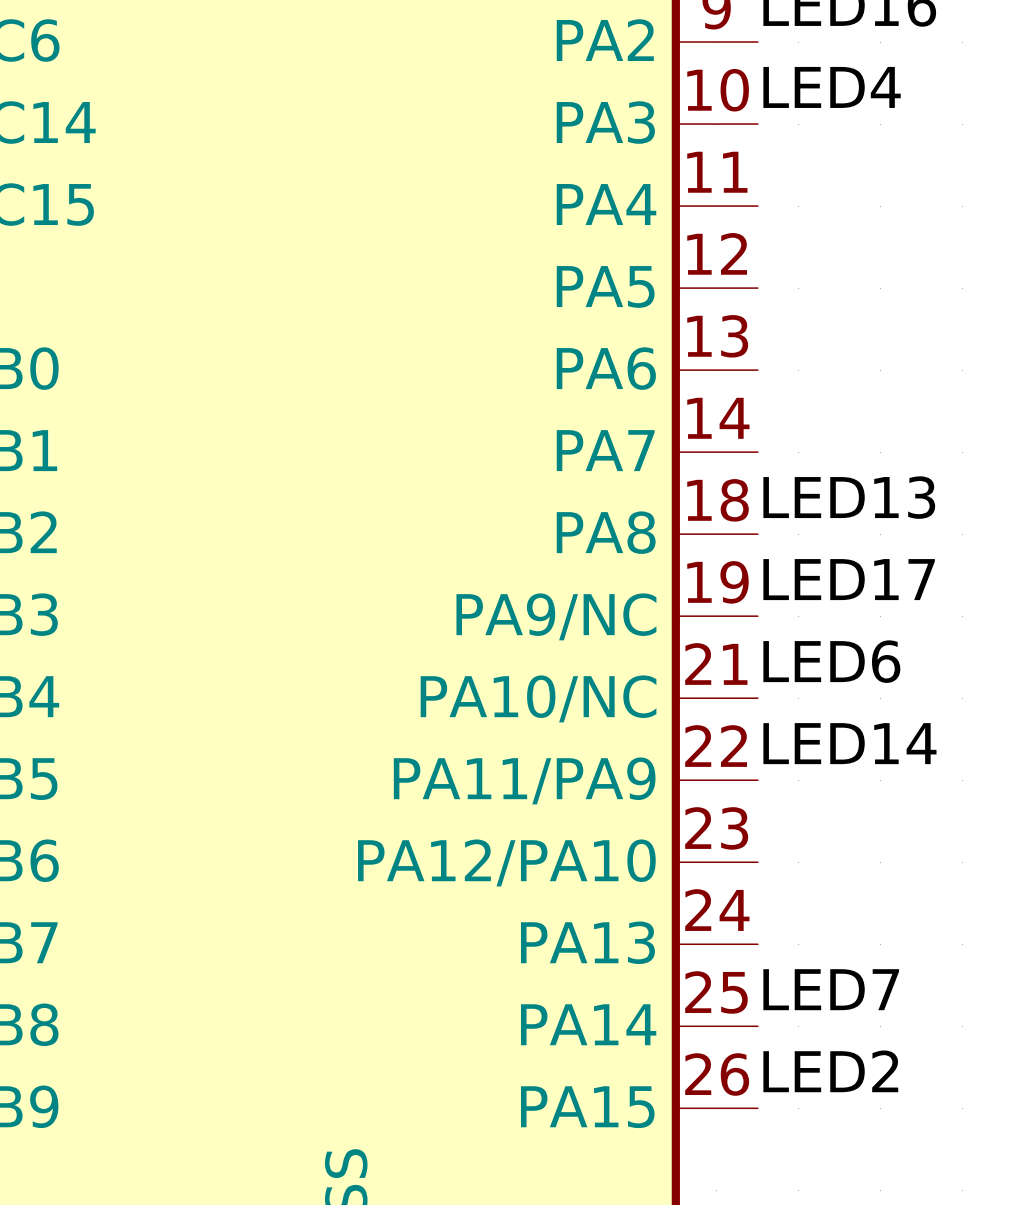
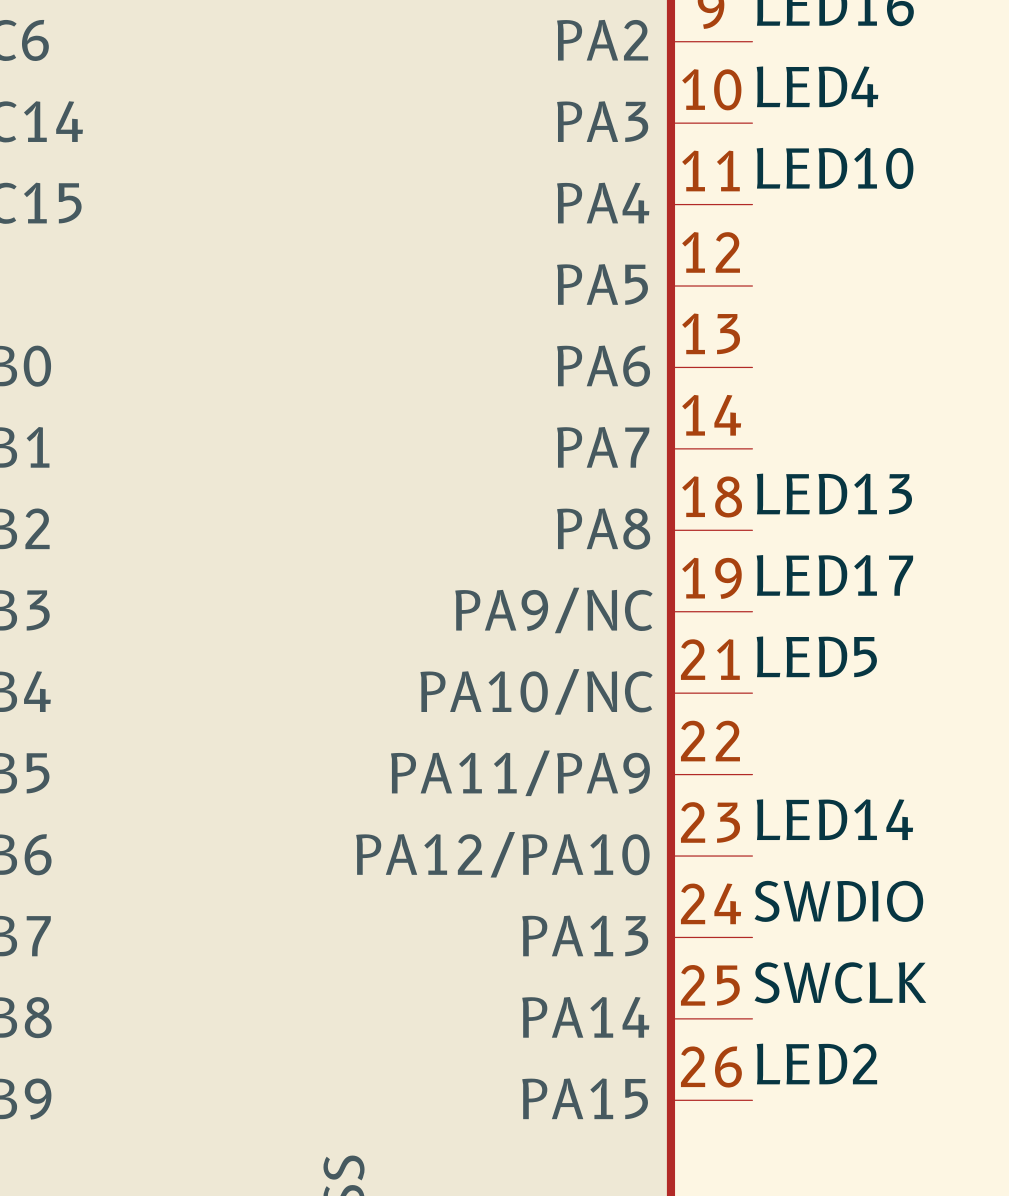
label: none -> LED10 (835, 168)
label: LED6 (831, 661) -> LED5 (816, 656)
label position: LED14 (849, 743) -> LED14 (834, 819)
label: none -> SWDIO (838, 901)
label: LED7 (831, 989) -> SWCLK (840, 982)

